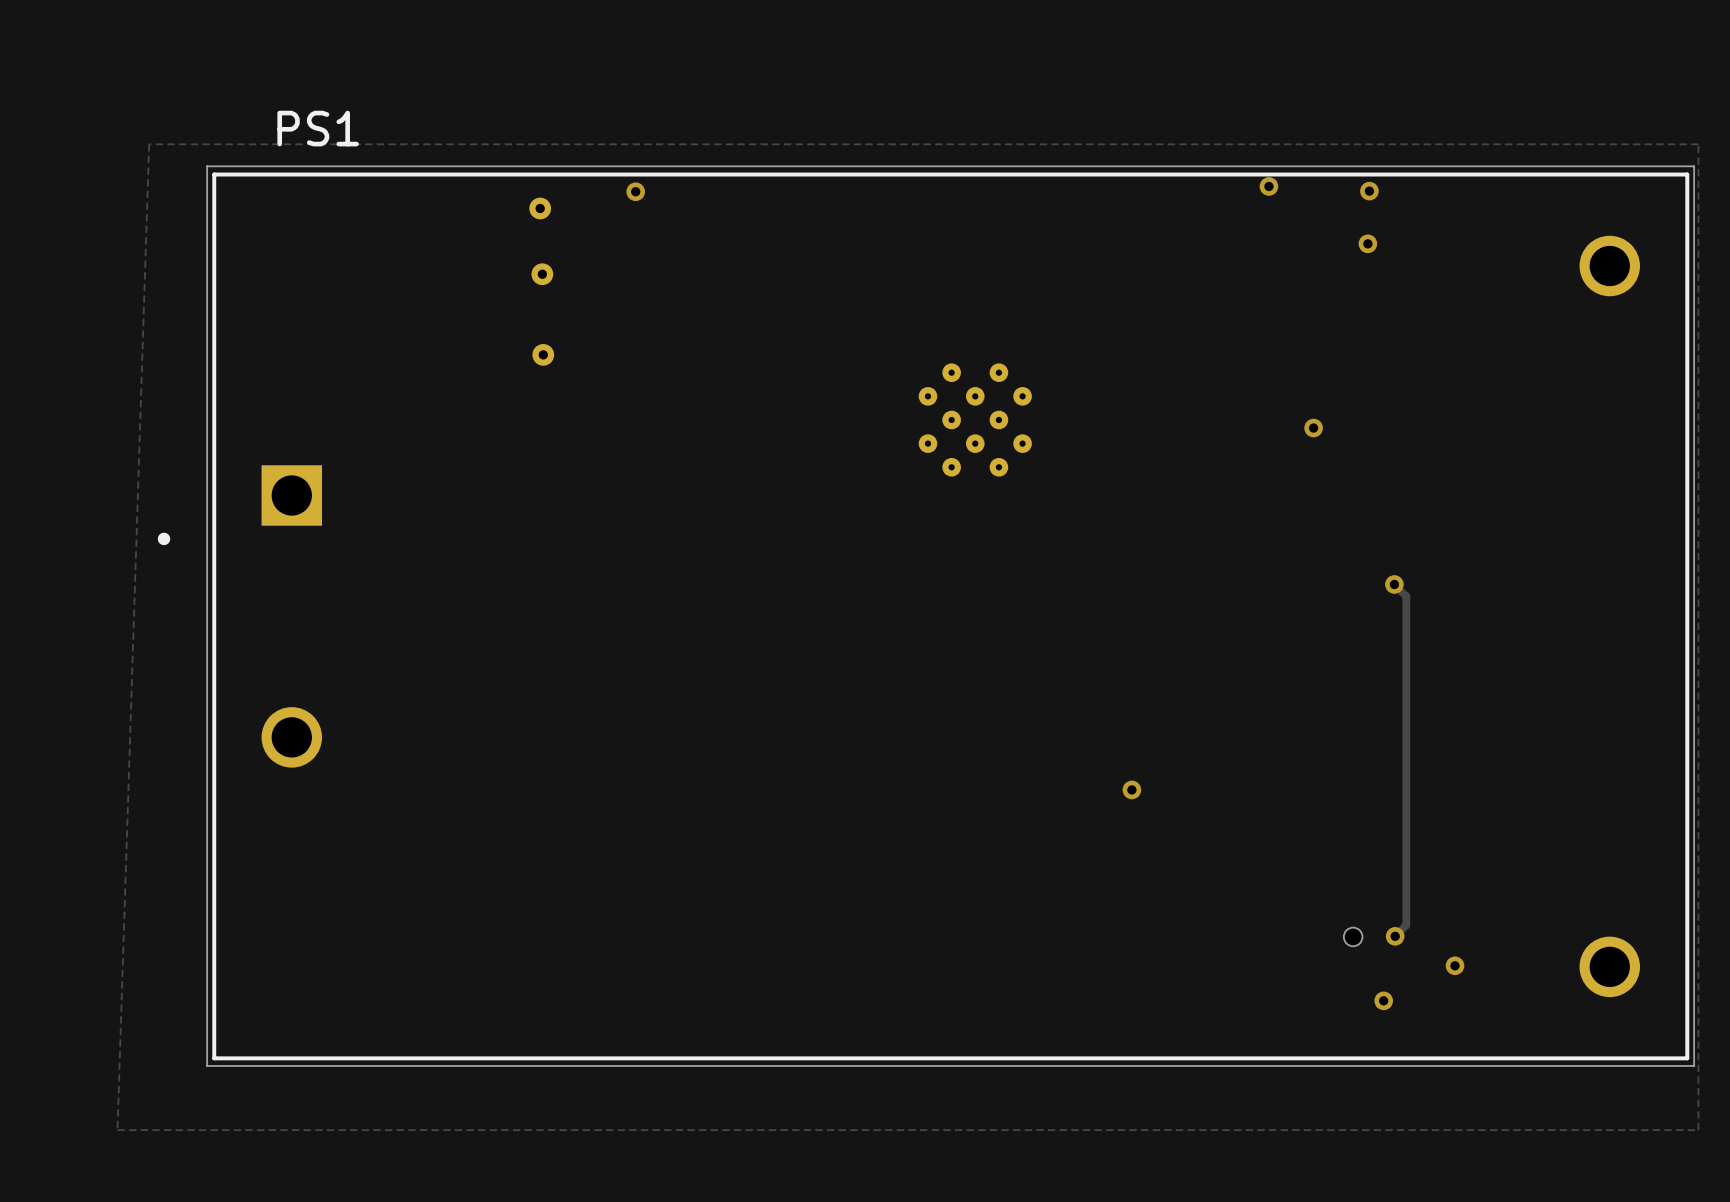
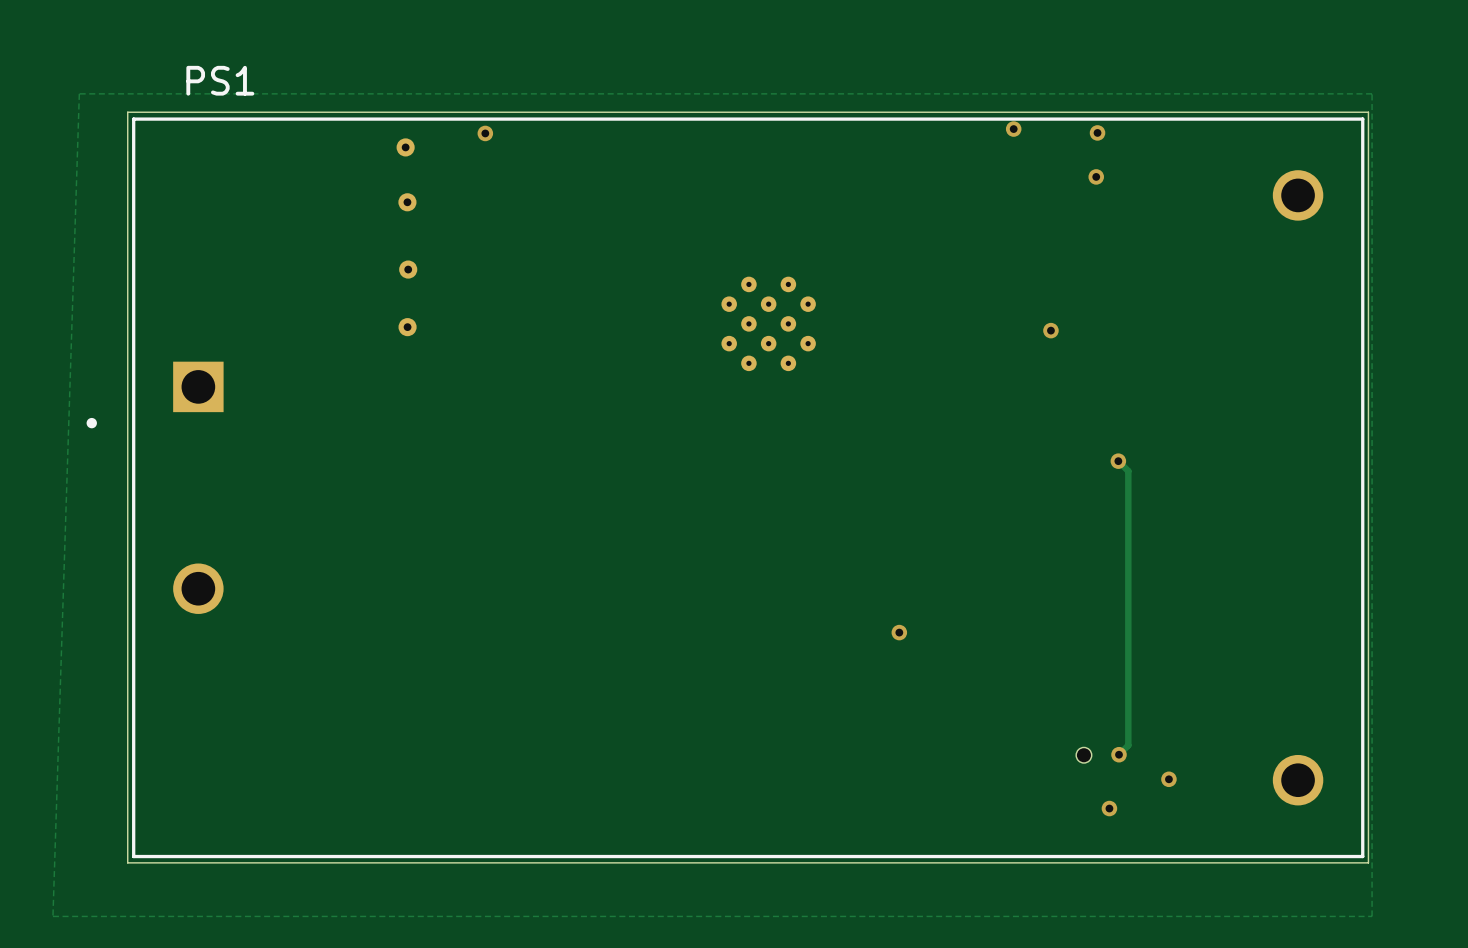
part: none -> (407, 327)

